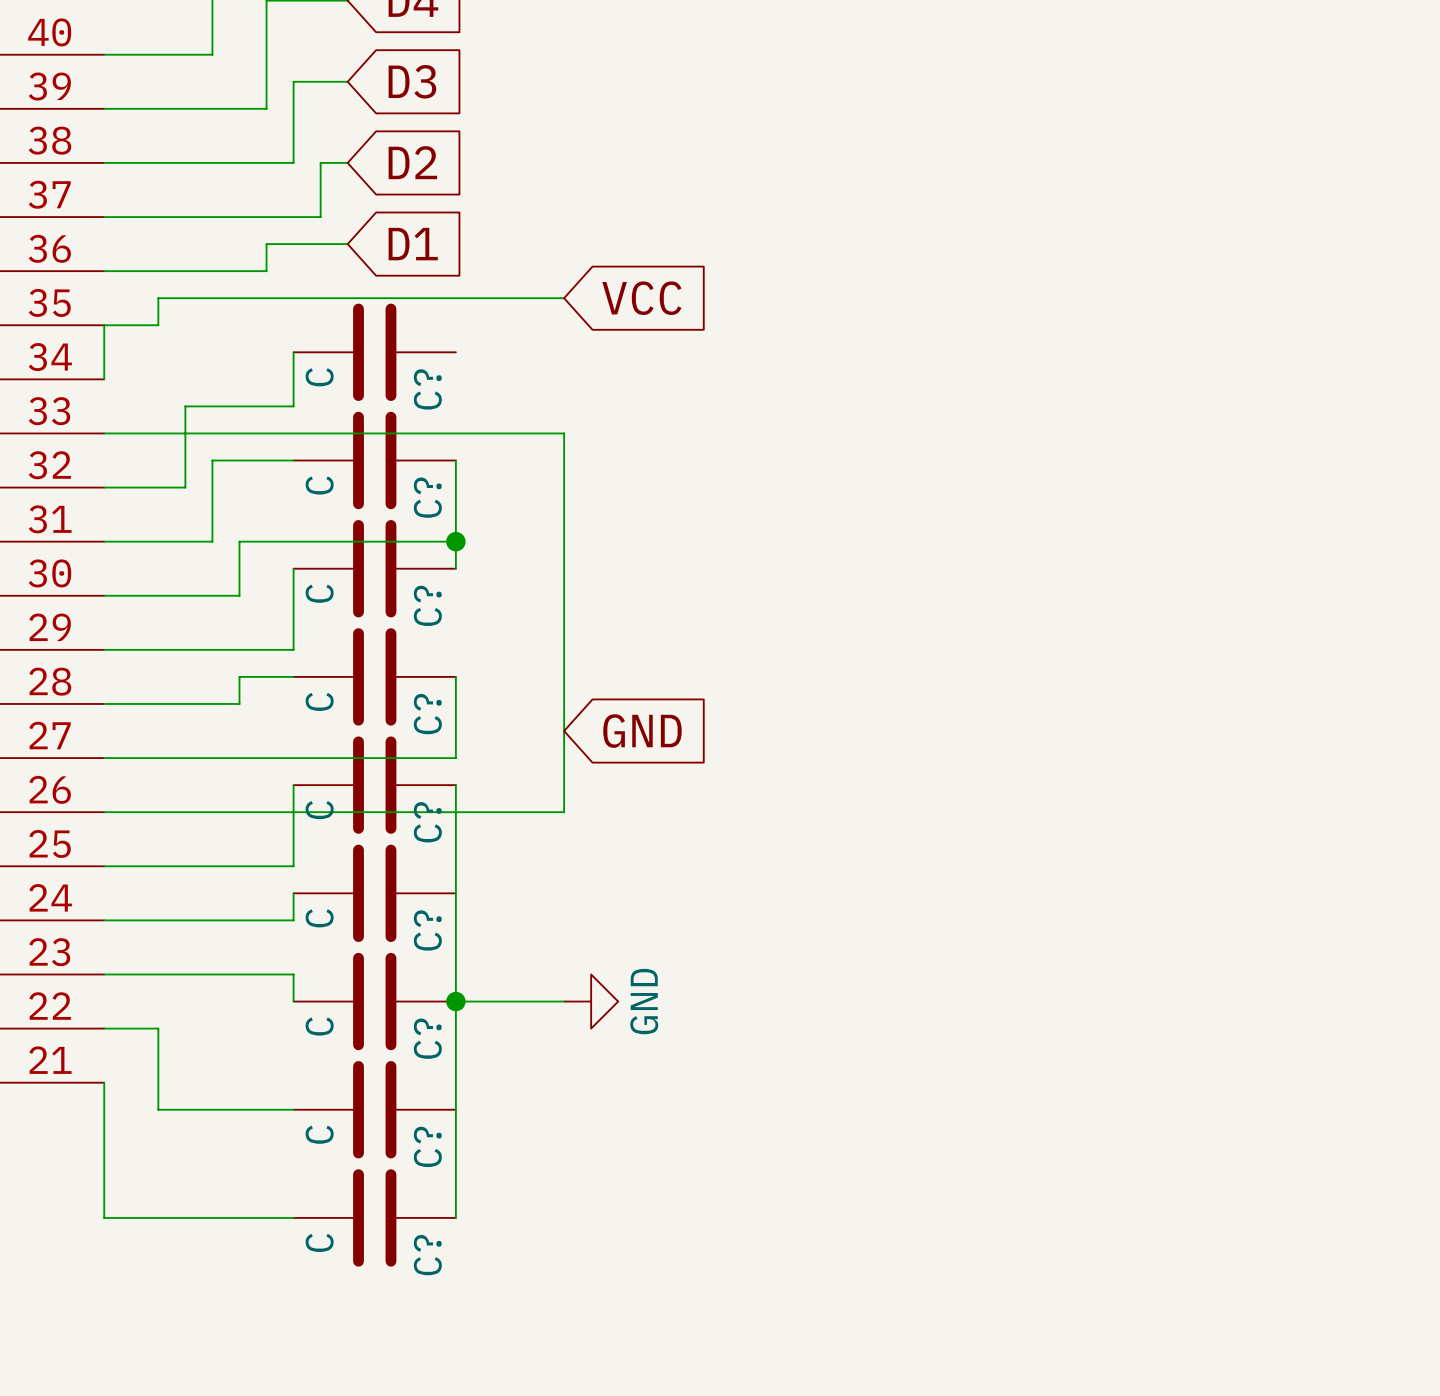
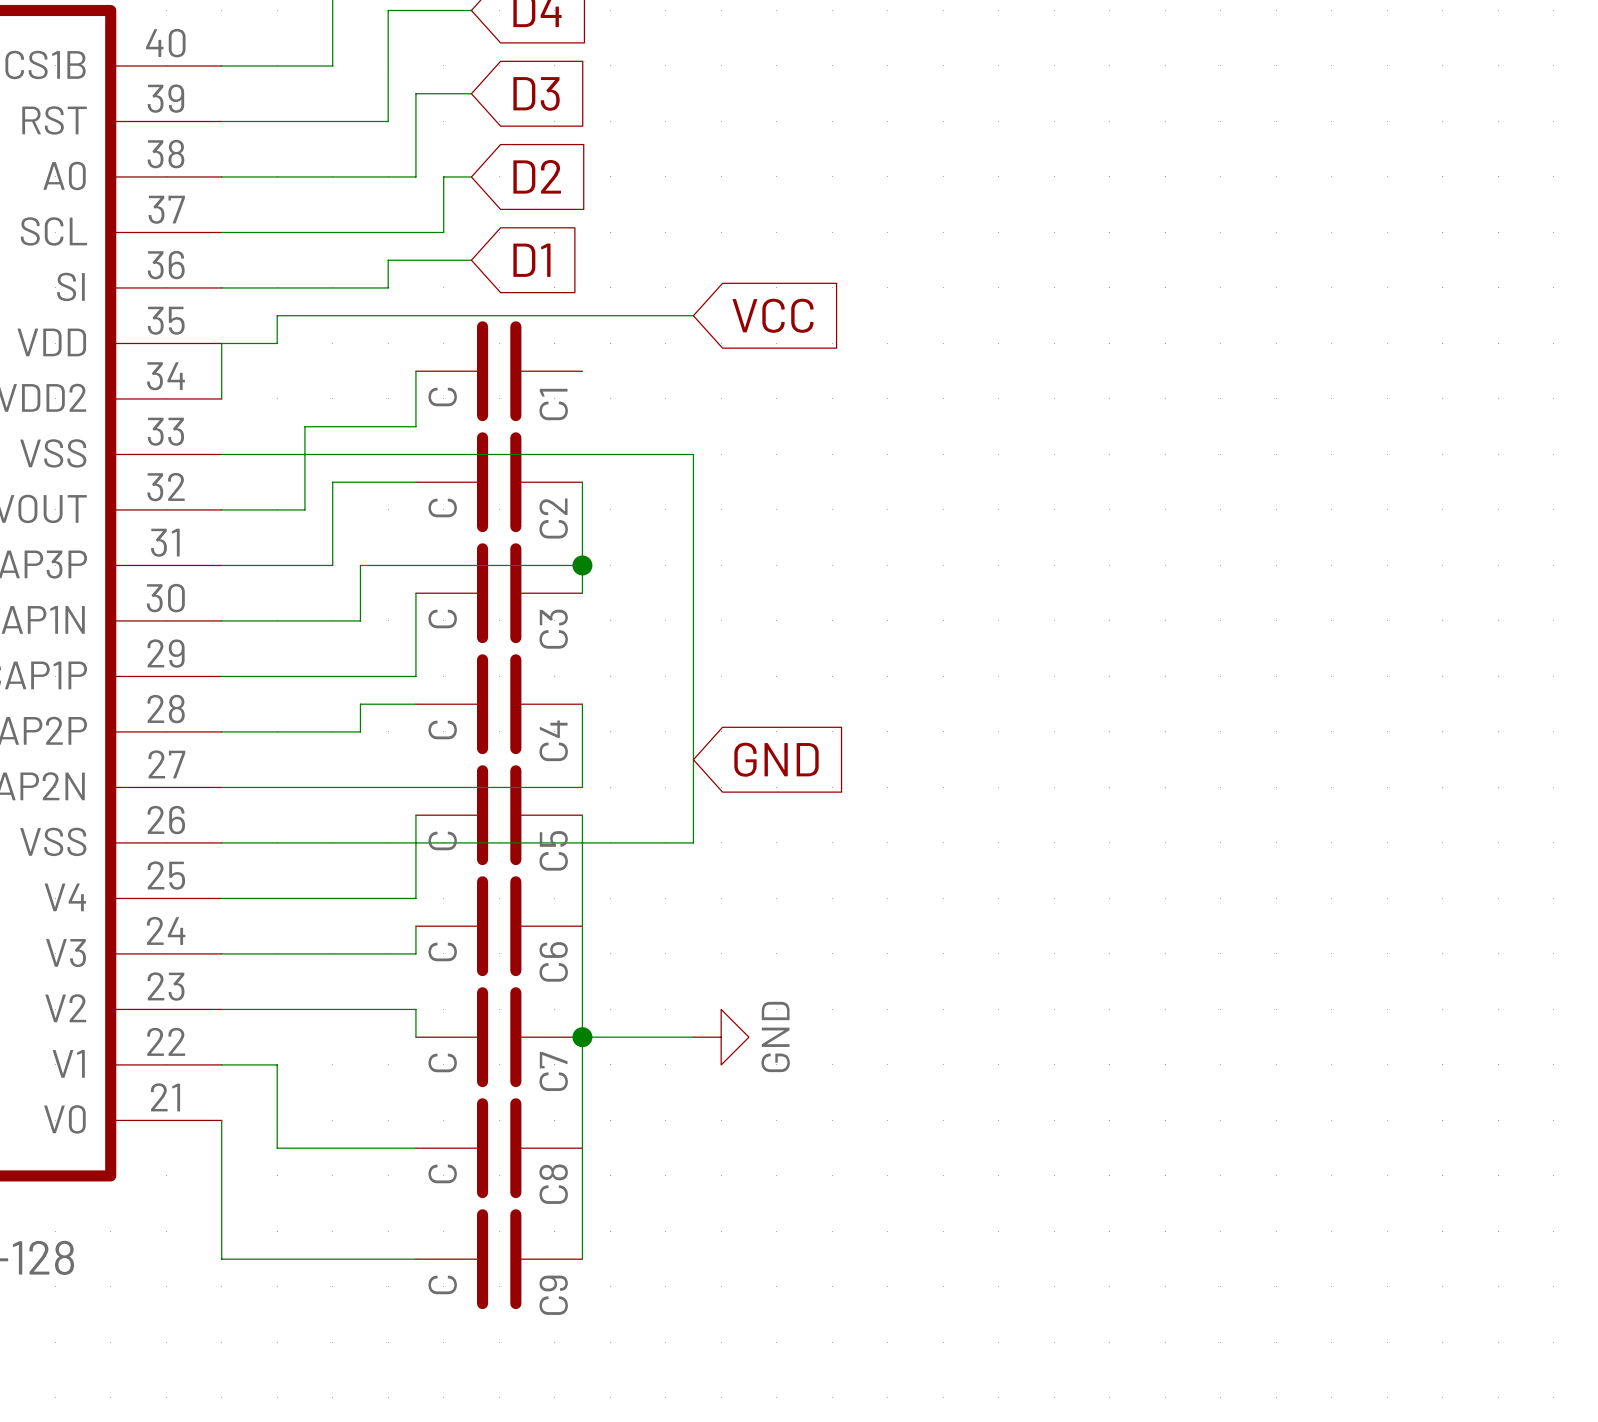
C? name: C? (427, 389) -> C1 (553, 404)
C? name: C? (427, 497) -> C2 (553, 518)
C? name: C? (427, 605) -> C3 (553, 629)
C? name: C? (427, 714) -> C4 (553, 740)
C? name: C? (427, 822) -> C5 (553, 850)
C? name: C? (427, 930) -> C6 (553, 961)
C? name: C? (427, 1038) -> C7 (553, 1071)
C? name: C? (427, 1146) -> C8 (553, 1184)
C? name: C? (427, 1255) -> C9 (553, 1295)

